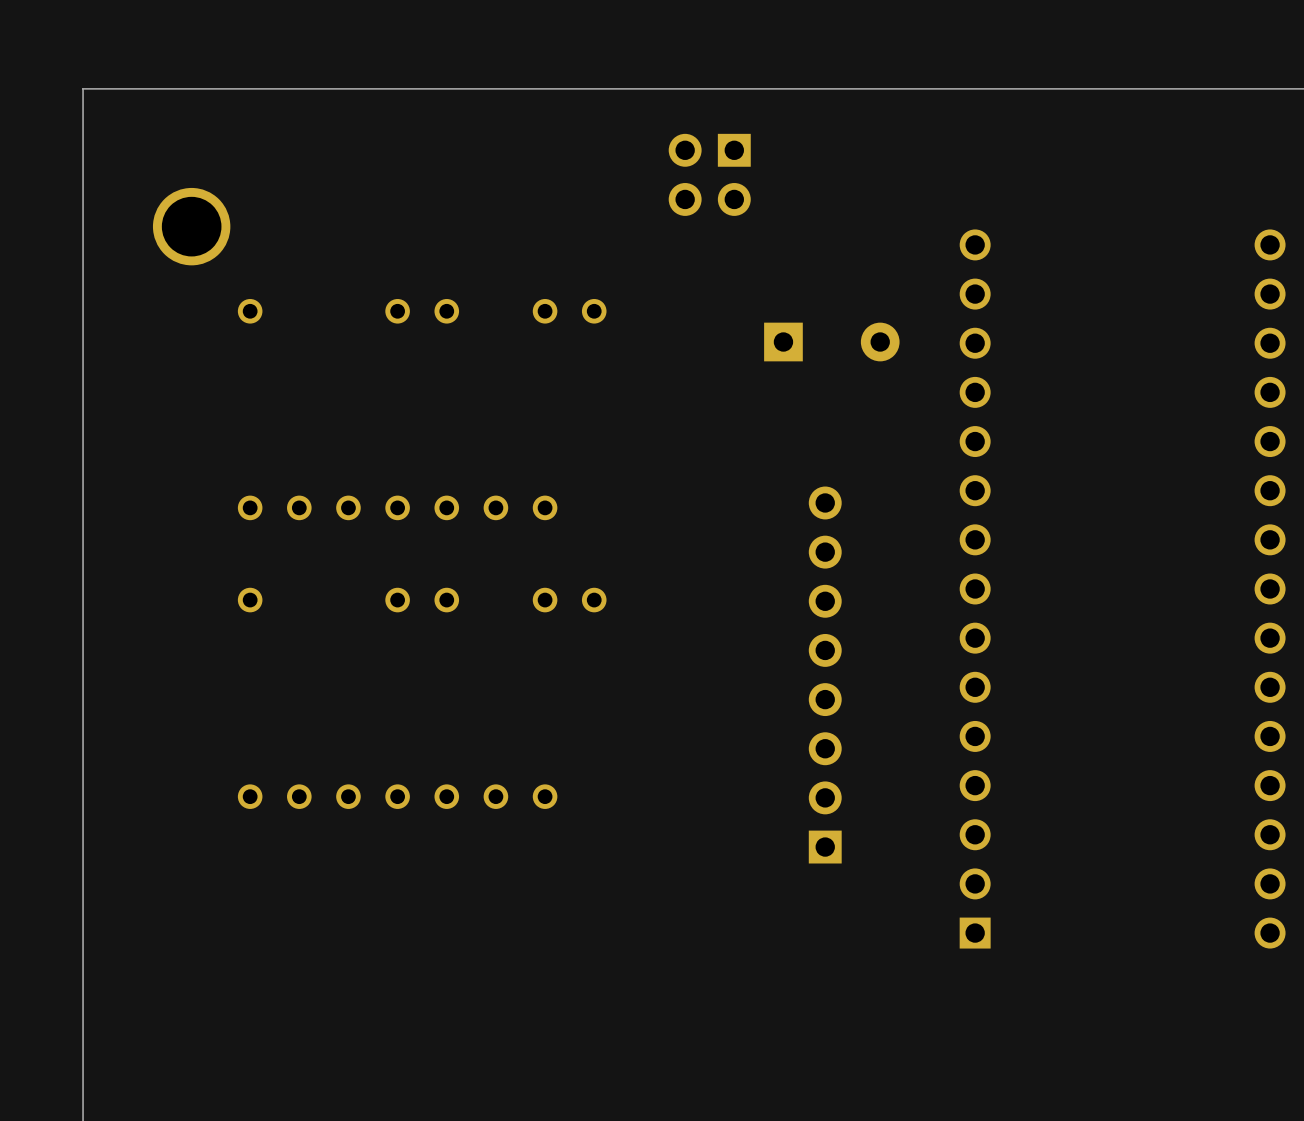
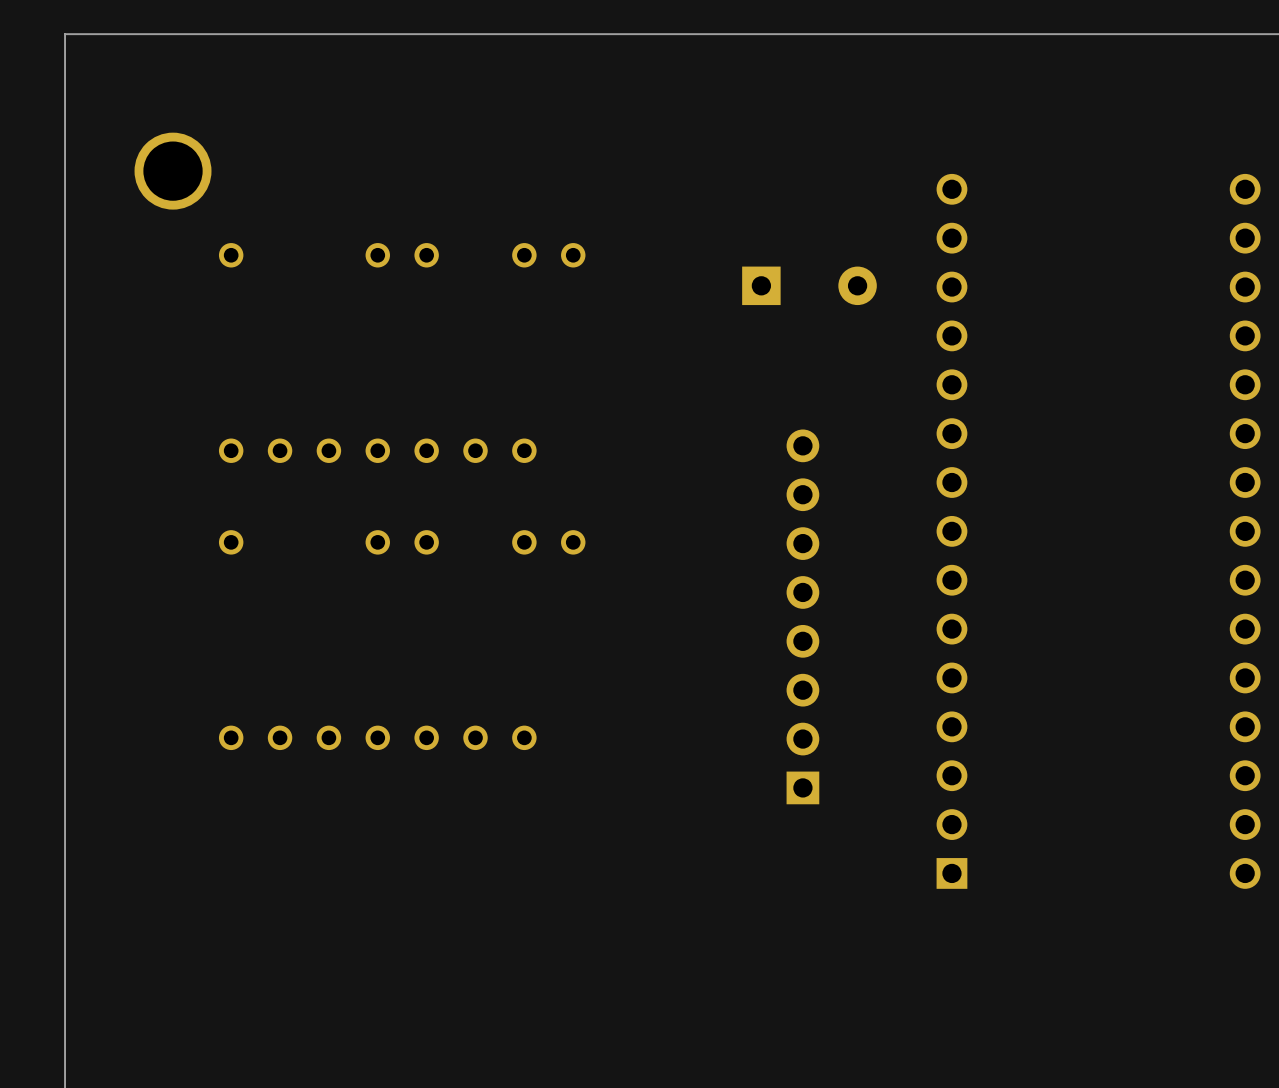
part: (709, 174) -> none

